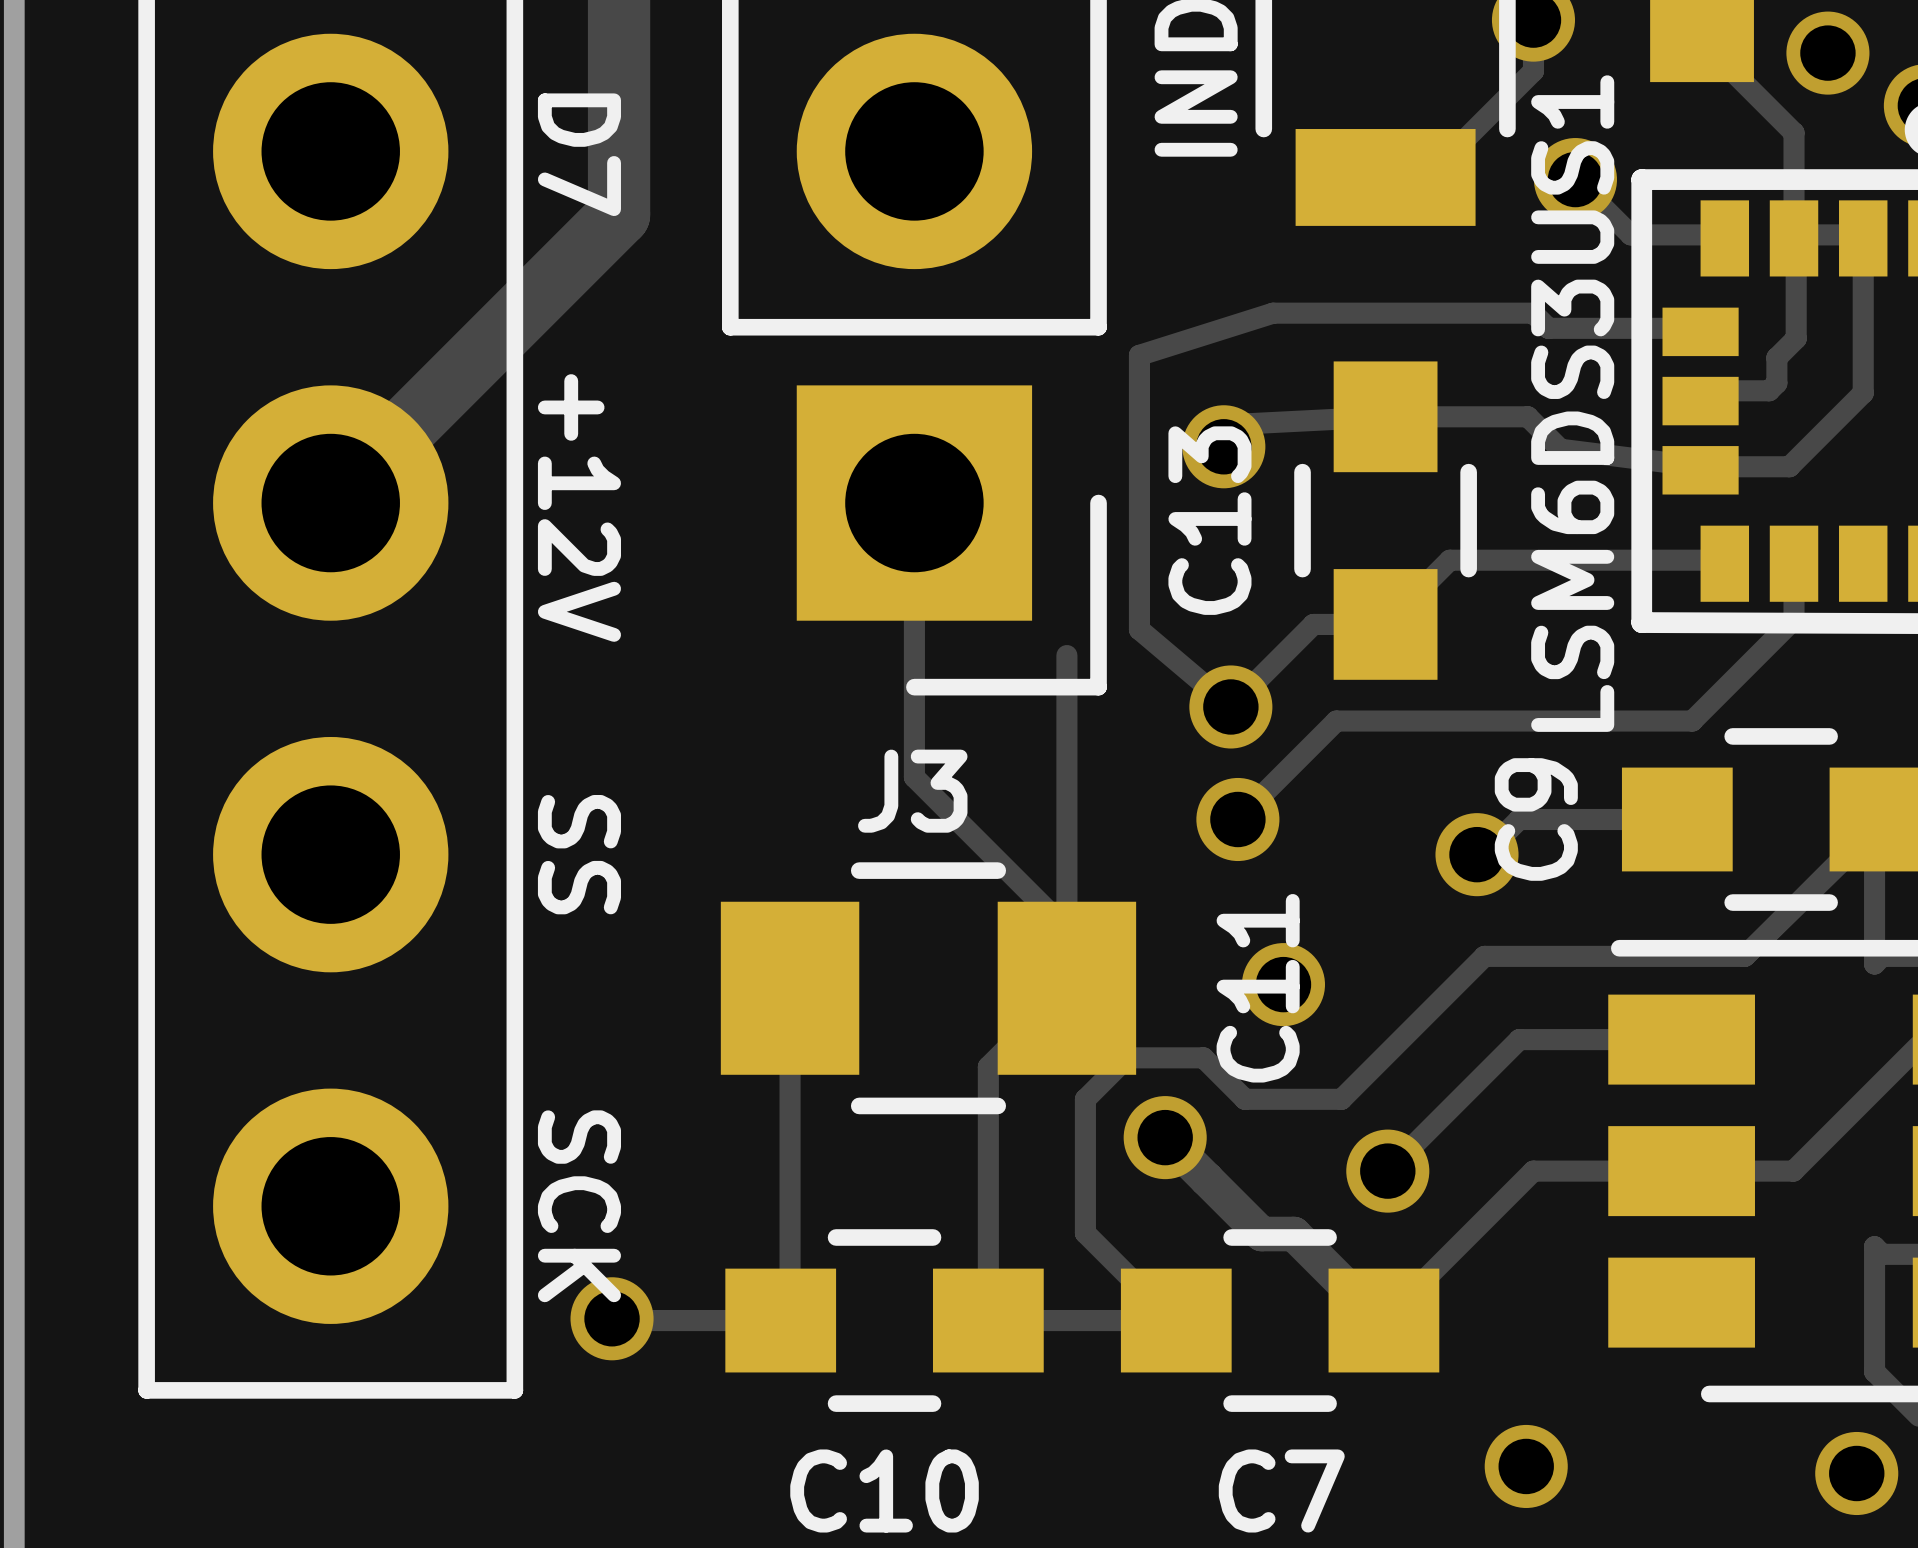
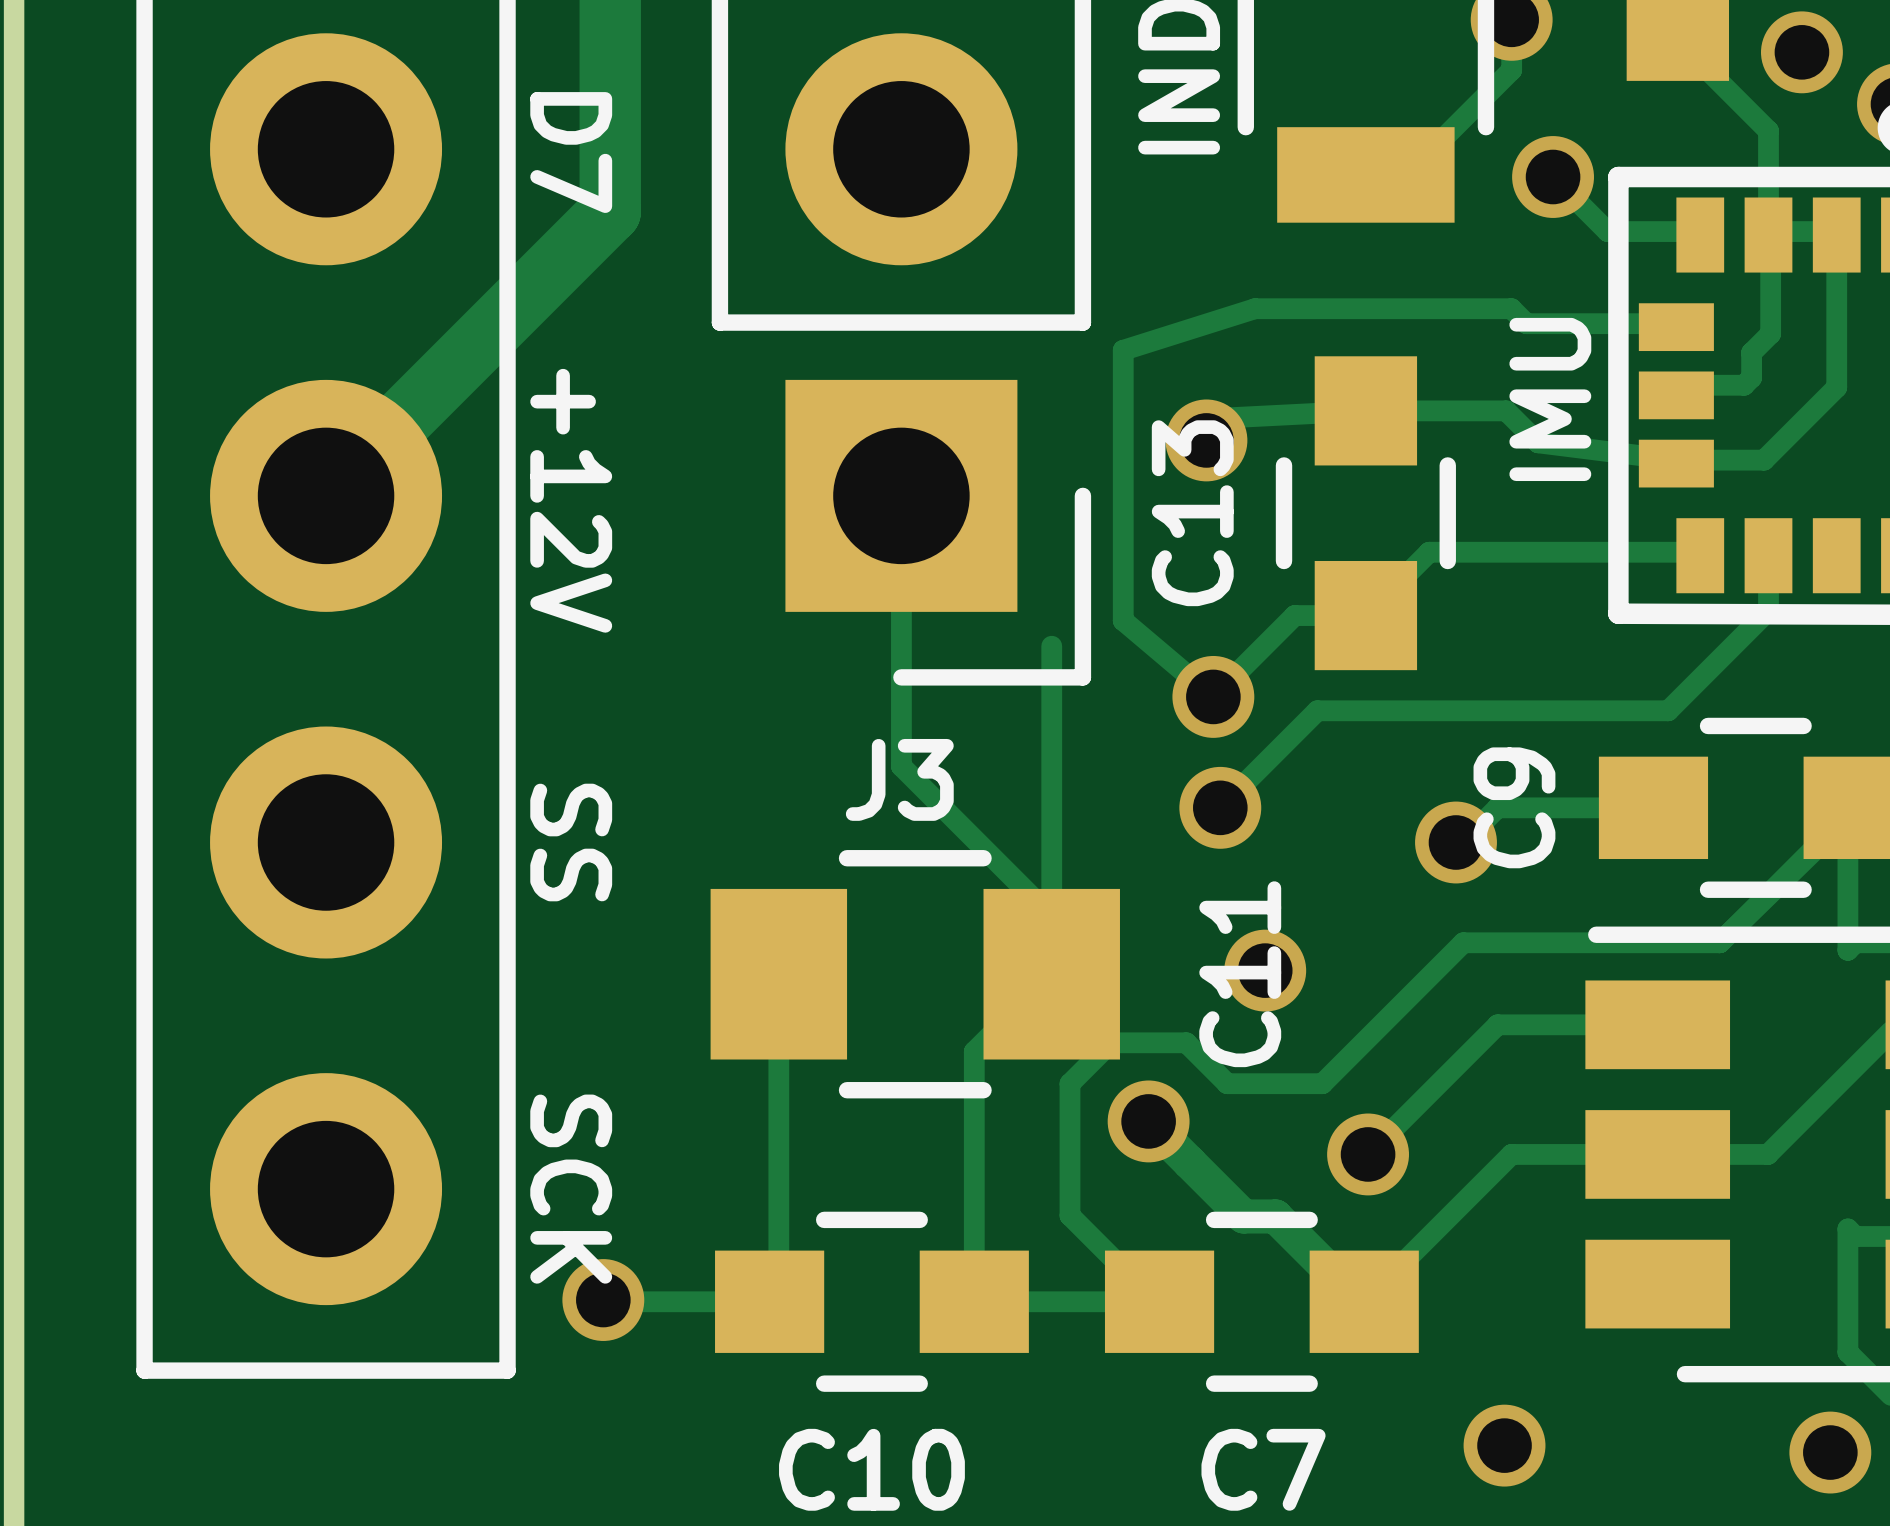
LSM6DS3US1 name: LSM6DS3US1 (1572, 403) -> IMU (1550, 399)

